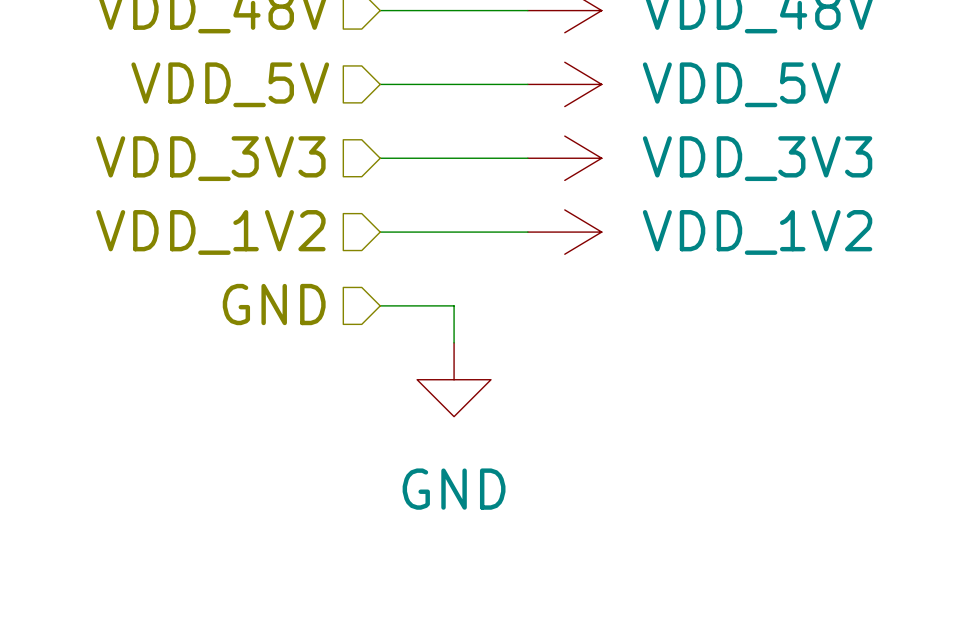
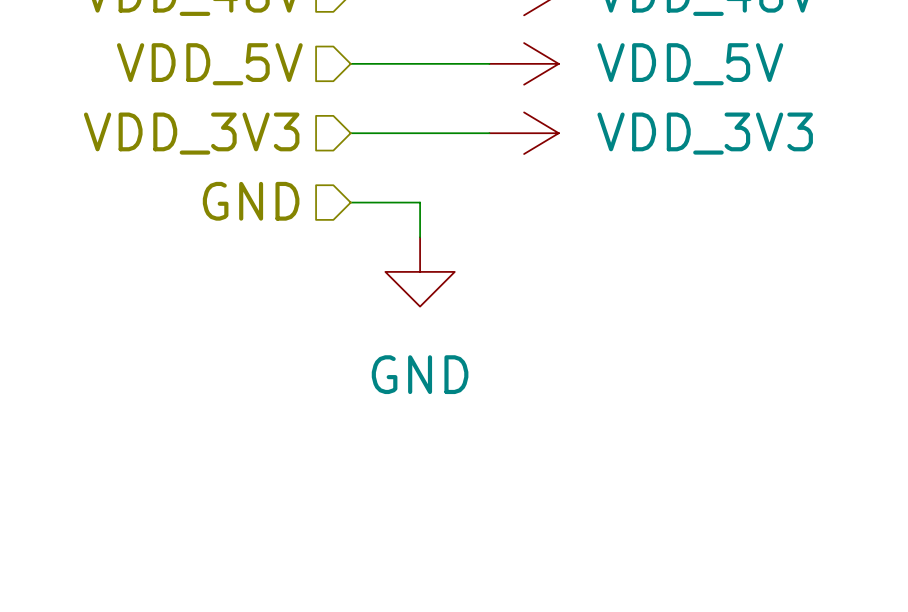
hierarchical label: VDD_1V2 (210, 232) -> GND (251, 201)
wire: (454, 232) (527, 232) -> (420, 202) (420, 237)
power symbol: VDD_1V2 (564, 232) -> none
hierarchical label: GND (274, 304) -> none
wire: (380, 305) (454, 305) (454, 342) -> none
power symbol position: GND (454, 379) -> GND (420, 271)

